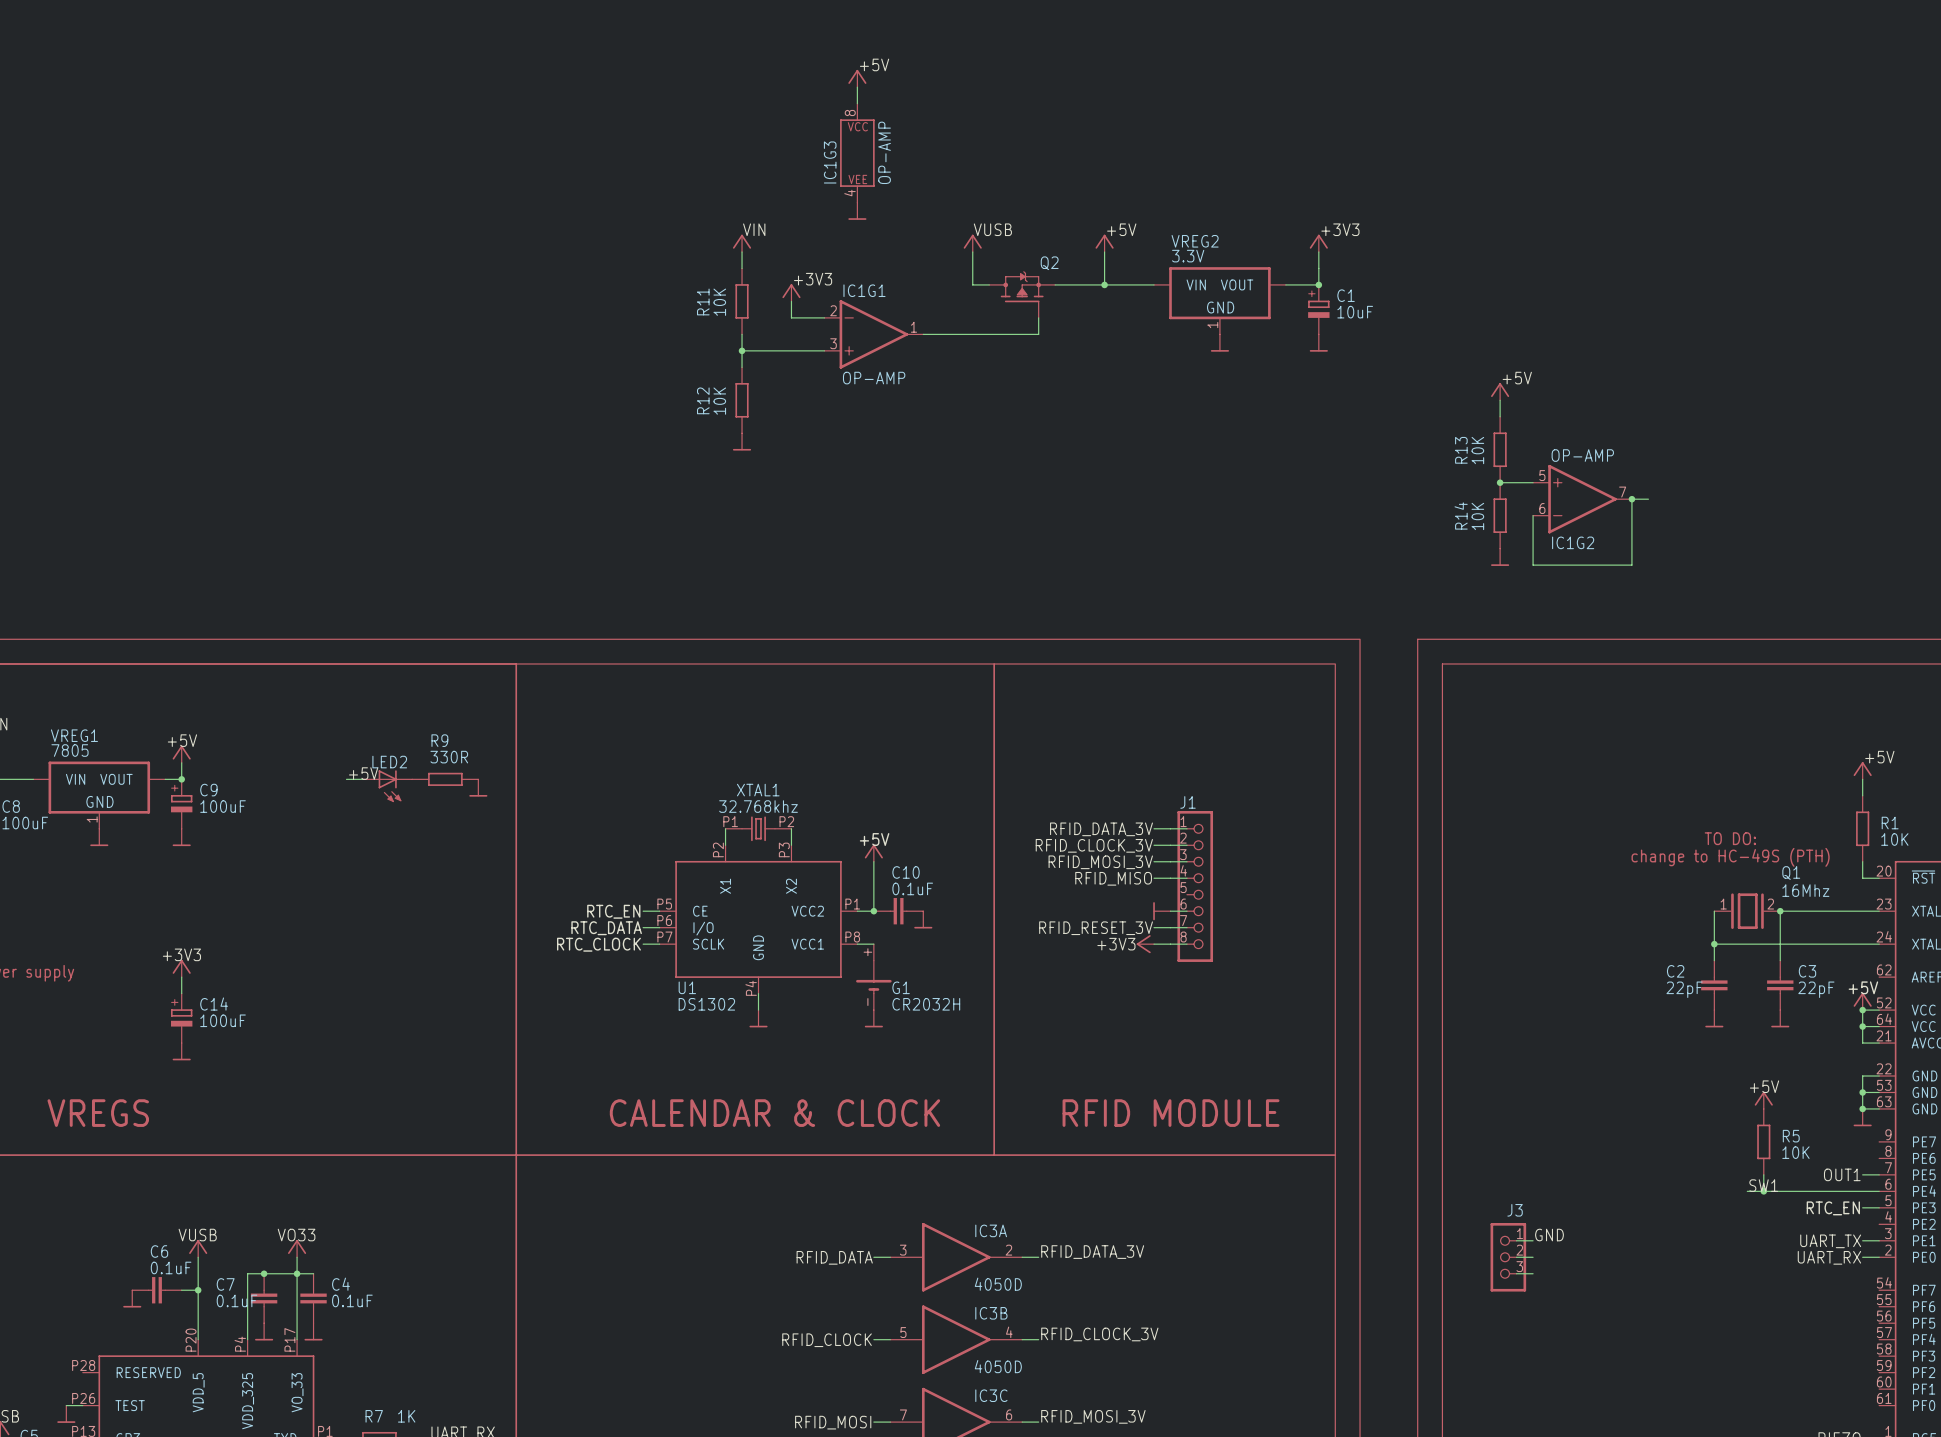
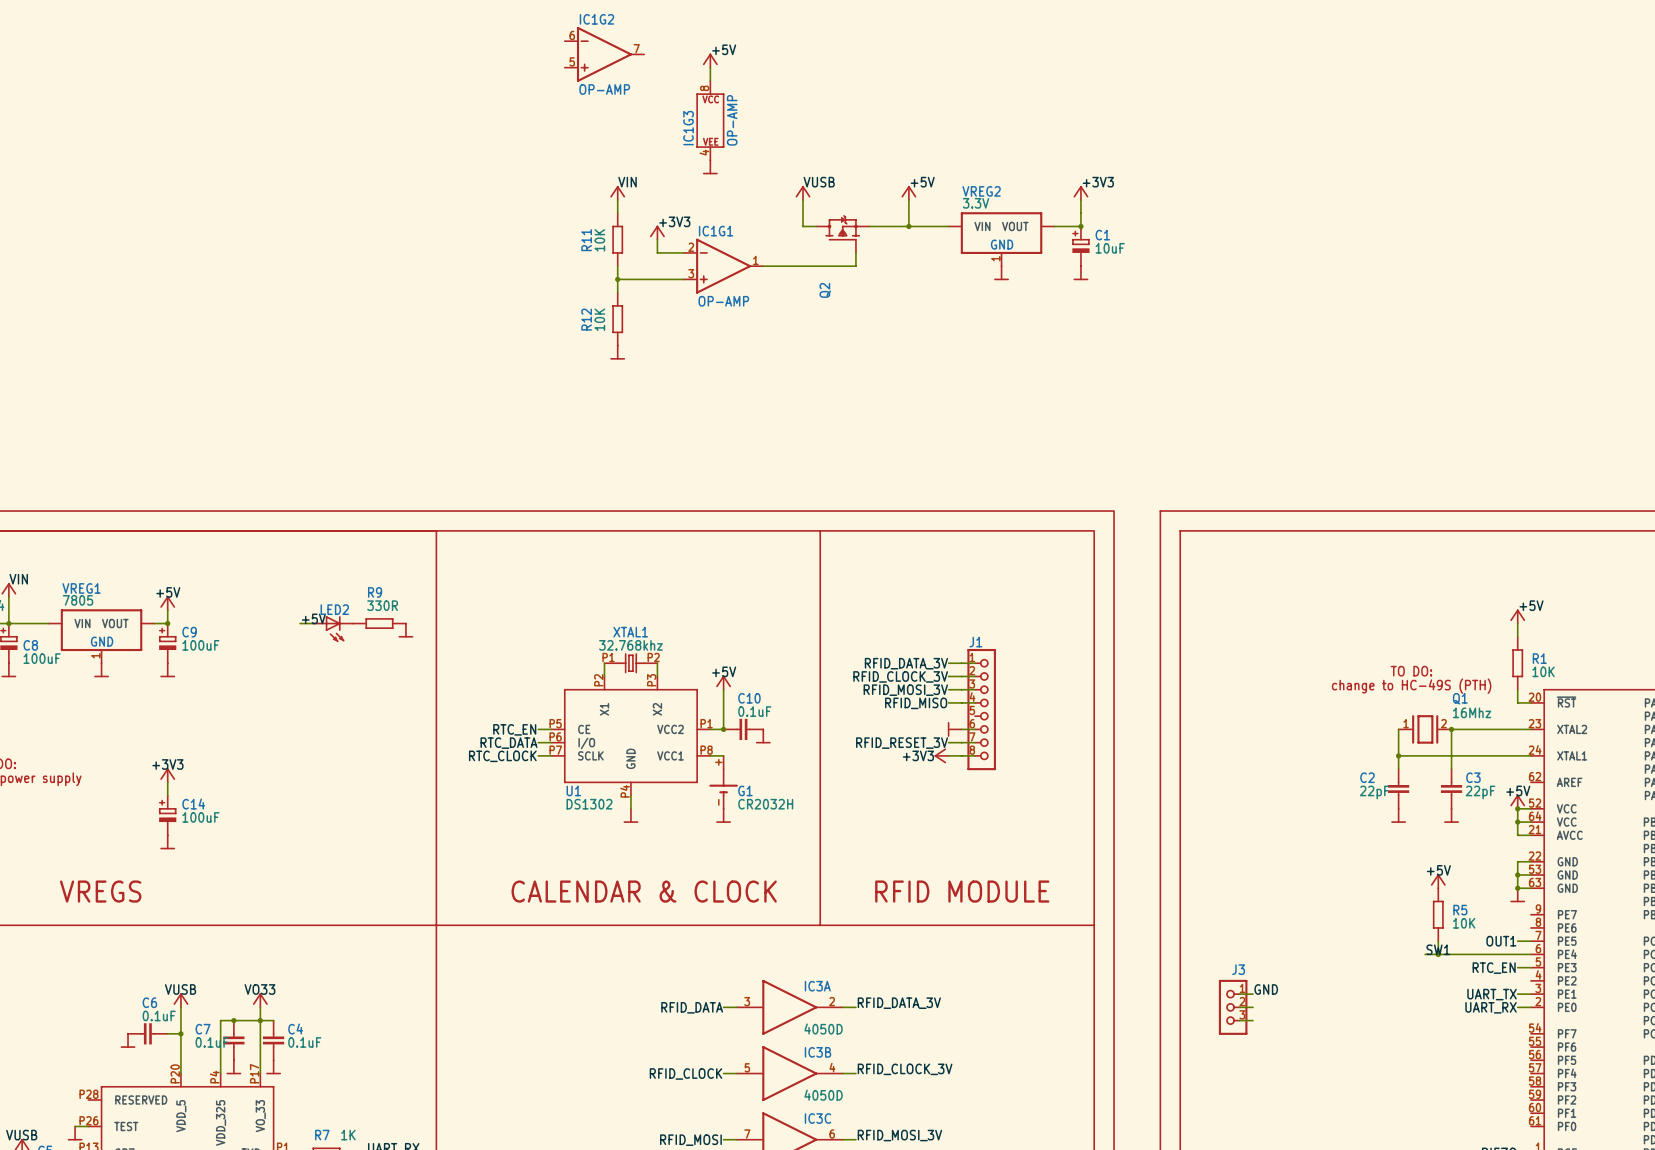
Q2 name rotation: 0° (1049, 263) -> 90° counterclockwise (825, 290)
Q2 name position: Q2 (1049, 263) -> Q2 (825, 290)
label: +5V (1517, 378) -> none
power symbol: (1500, 391) -> none
wire: (1500, 400) (1500, 416) -> none
R13: 10K (1500, 449) -> none
wire: (1500, 482) (1533, 482) -> none
junction: (1500, 482) -> none
IC1G2 flip: as is (1582, 499) -> up-down (604, 54)
IC1G2 position: (1582, 499) -> (604, 54)
junction: (1631, 499) -> none
wire: (1648, 499) (1631, 499) (1631, 565) (1533, 565) (1533, 515) -> none
R14: 10K (1500, 515) -> none
power symbol: (1500, 557) -> none

